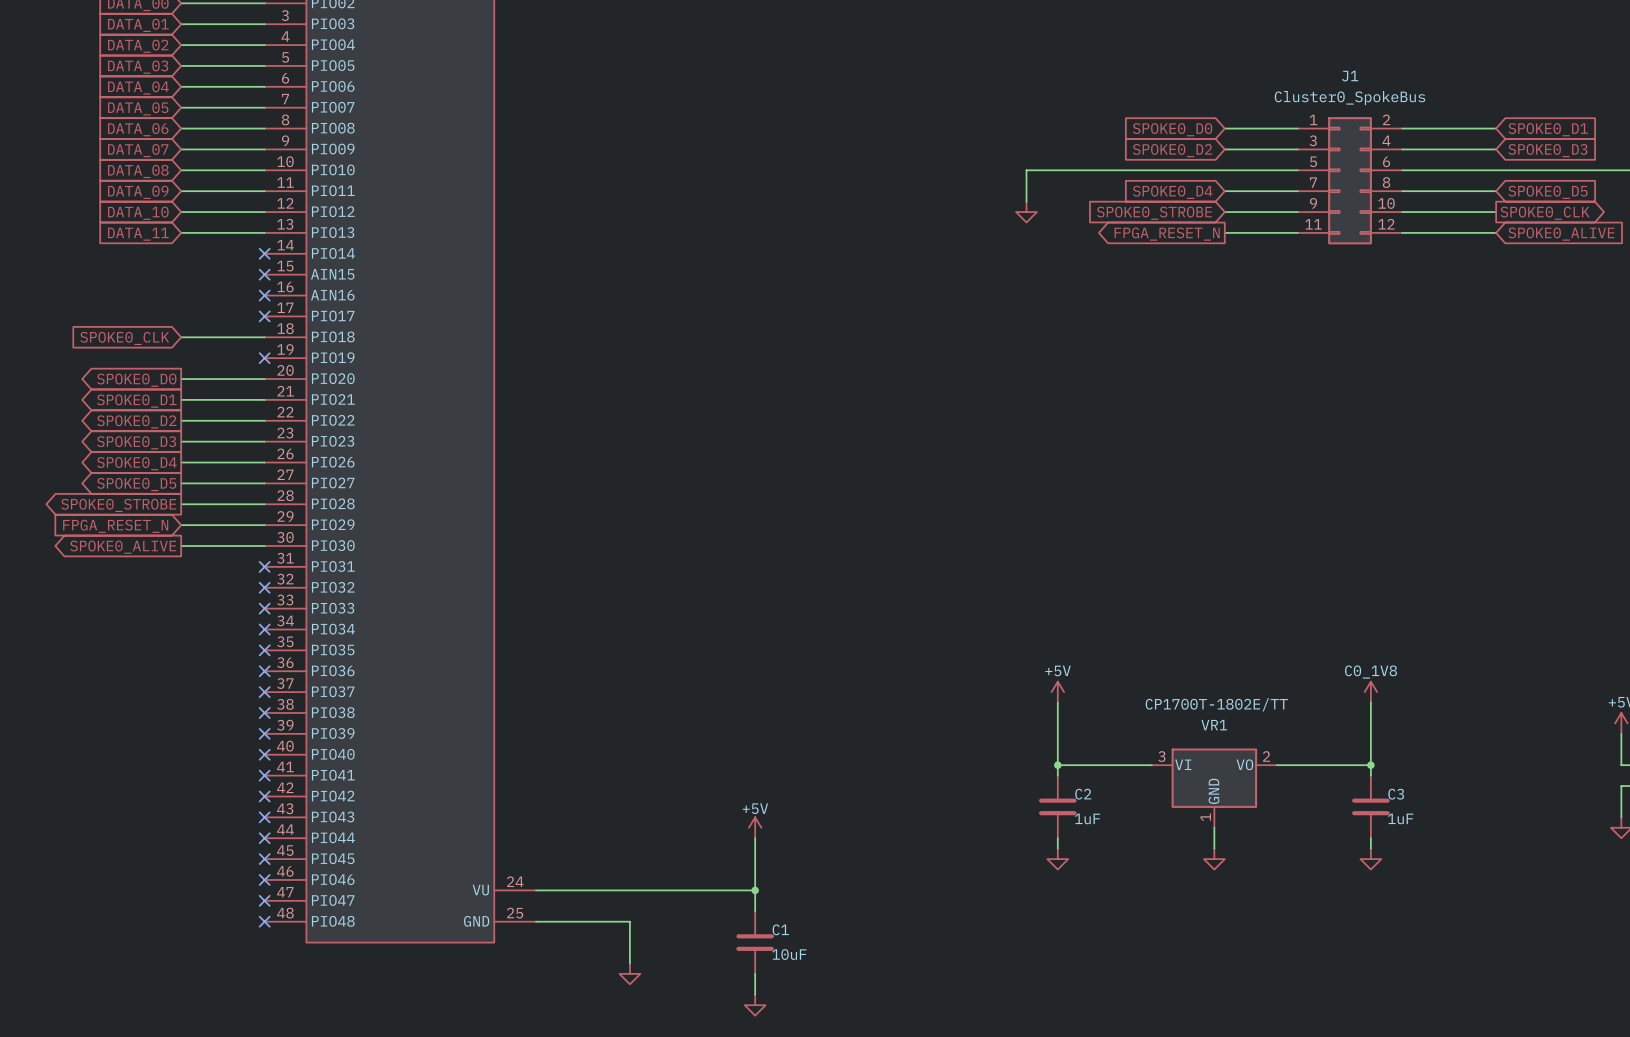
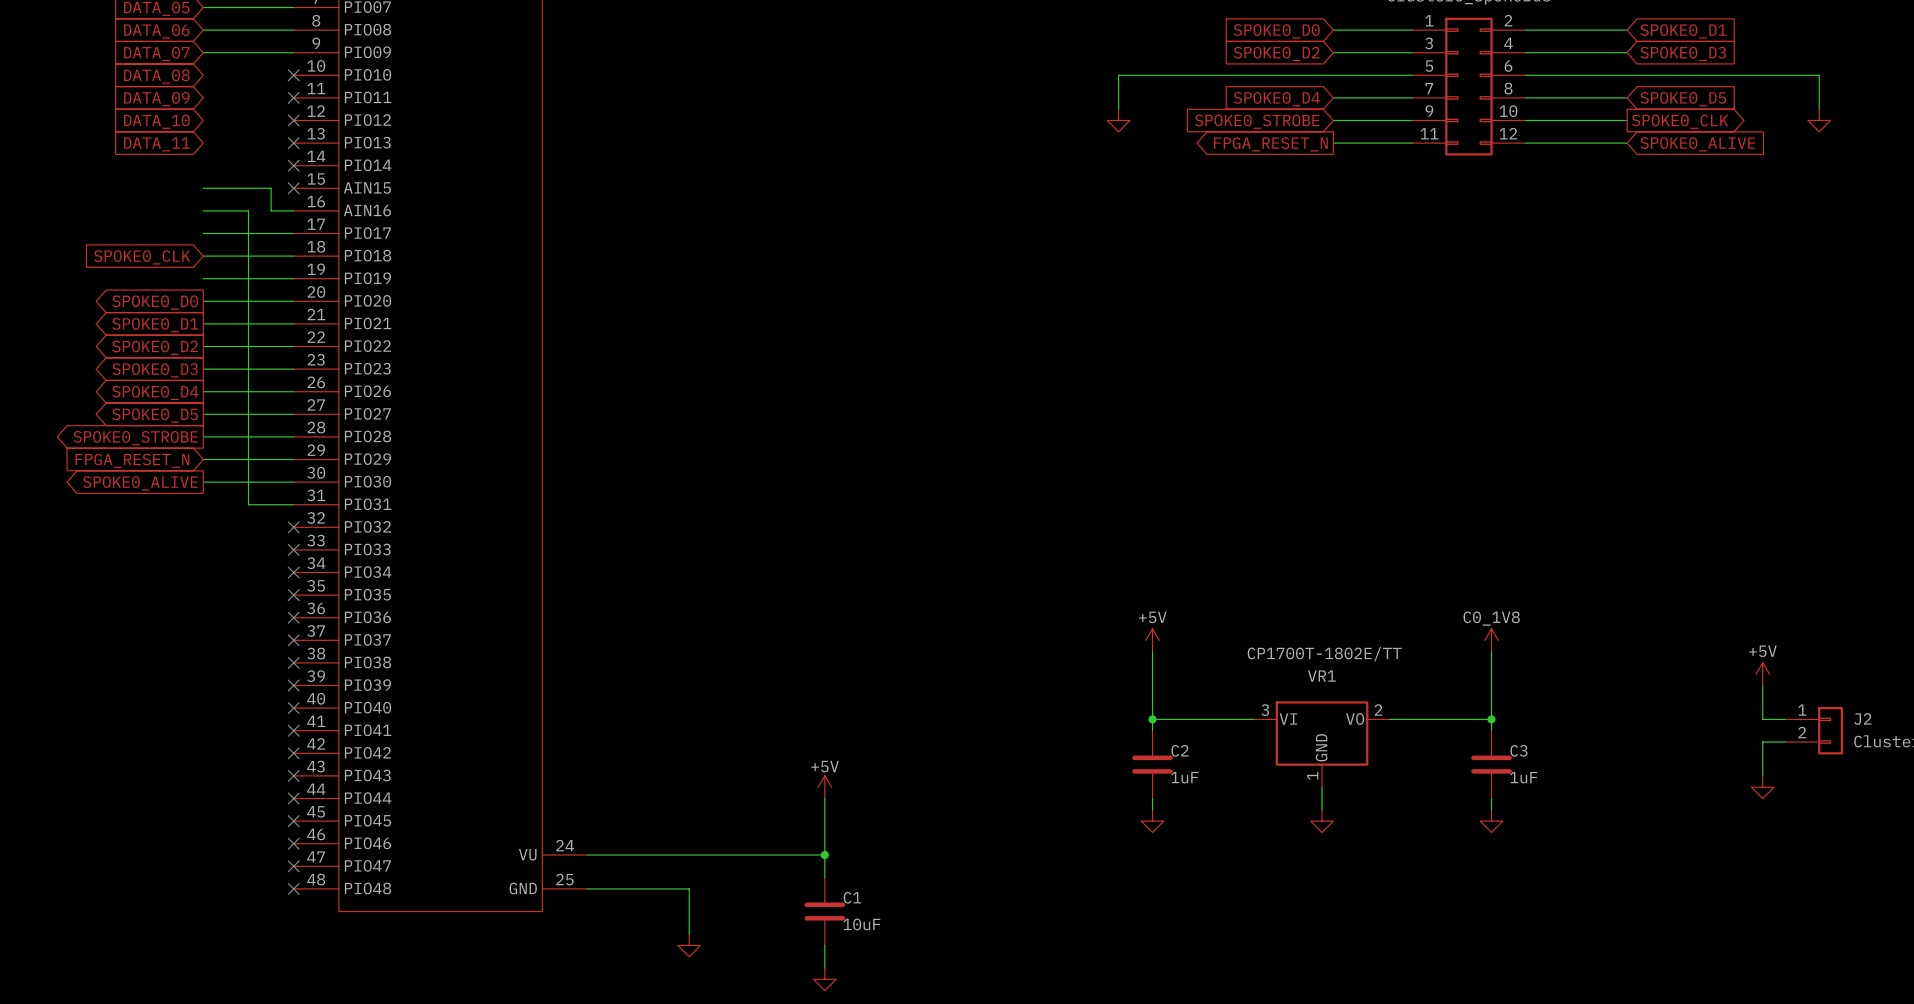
wire: (181, 170) (264, 170) -> none
no-connect mark: none -> (293, 75)
wire: (181, 191) (264, 191) -> (203, 233) (293, 233)
no-connect mark: none -> (293, 97)
wire: (181, 212) (264, 212) -> none
no-connect mark: none -> (293, 120)
wire: (181, 232) (264, 232) -> (203, 278) (293, 278)
no-connect mark: none -> (293, 143)
wire: none -> (203, 188) (271, 188) (271, 210) (293, 210)
wire: none -> (203, 210) (248, 210) (248, 504) (293, 504)
no-connect mark: (264, 295) -> none
no-connect mark: (264, 316) -> none
no-connect mark: (264, 358) -> none
no-connect mark: (264, 566) -> none

